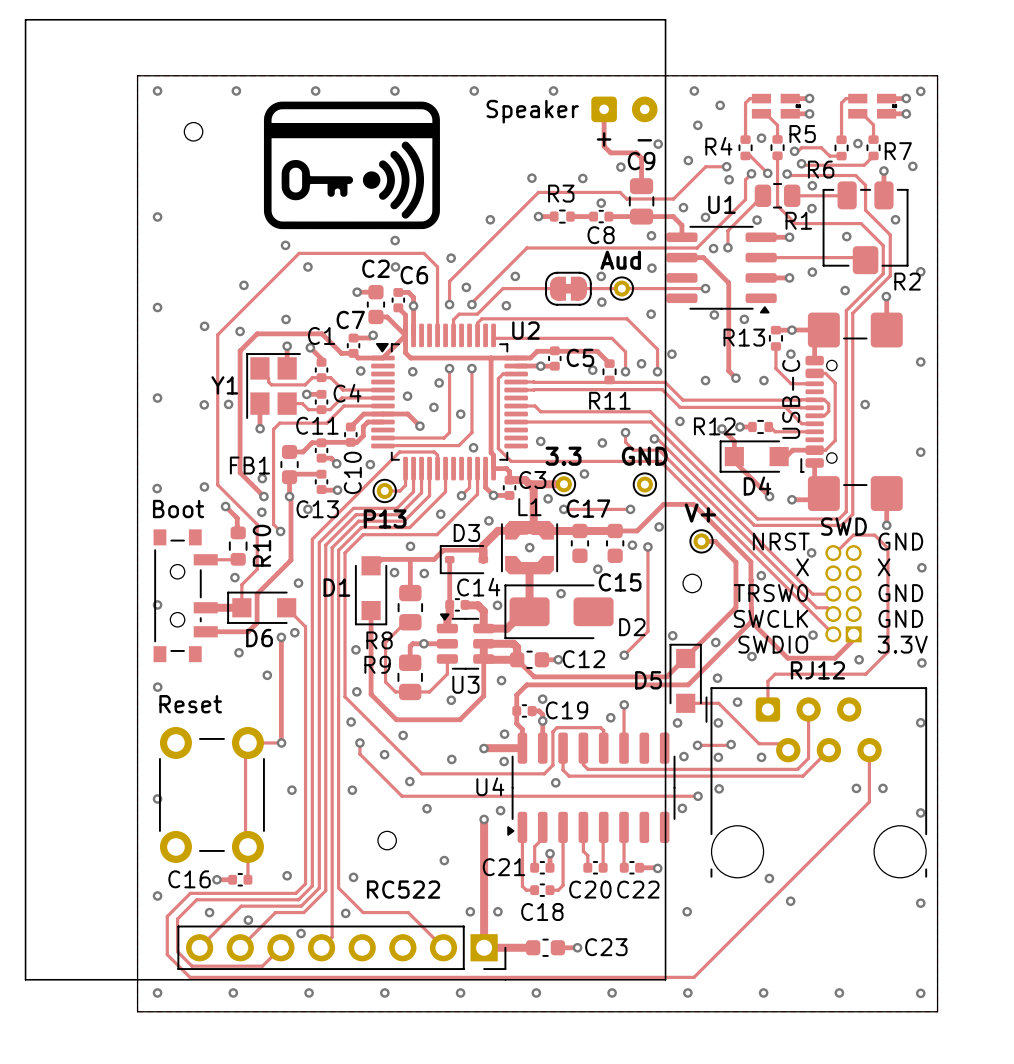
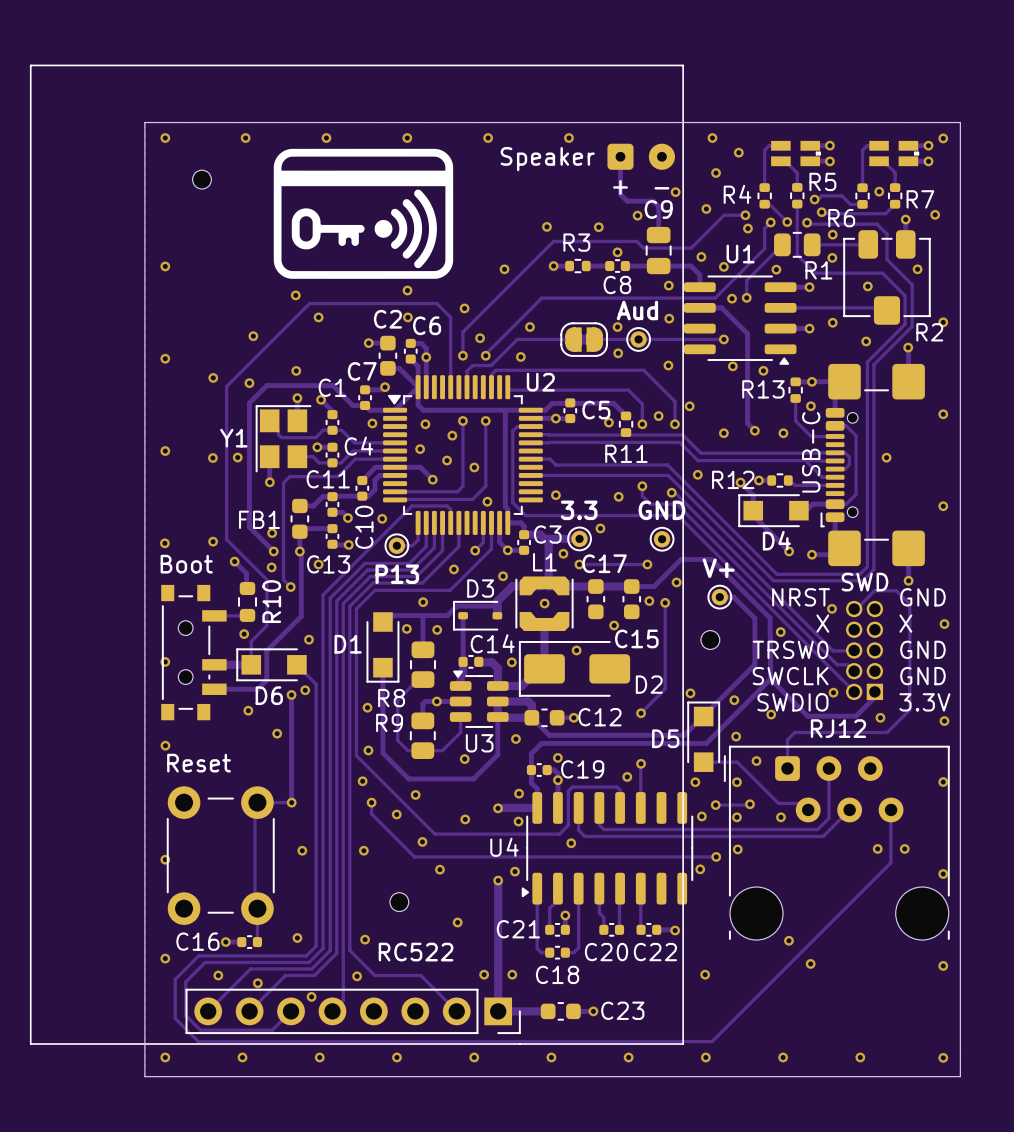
via: (761, 138) -> none

